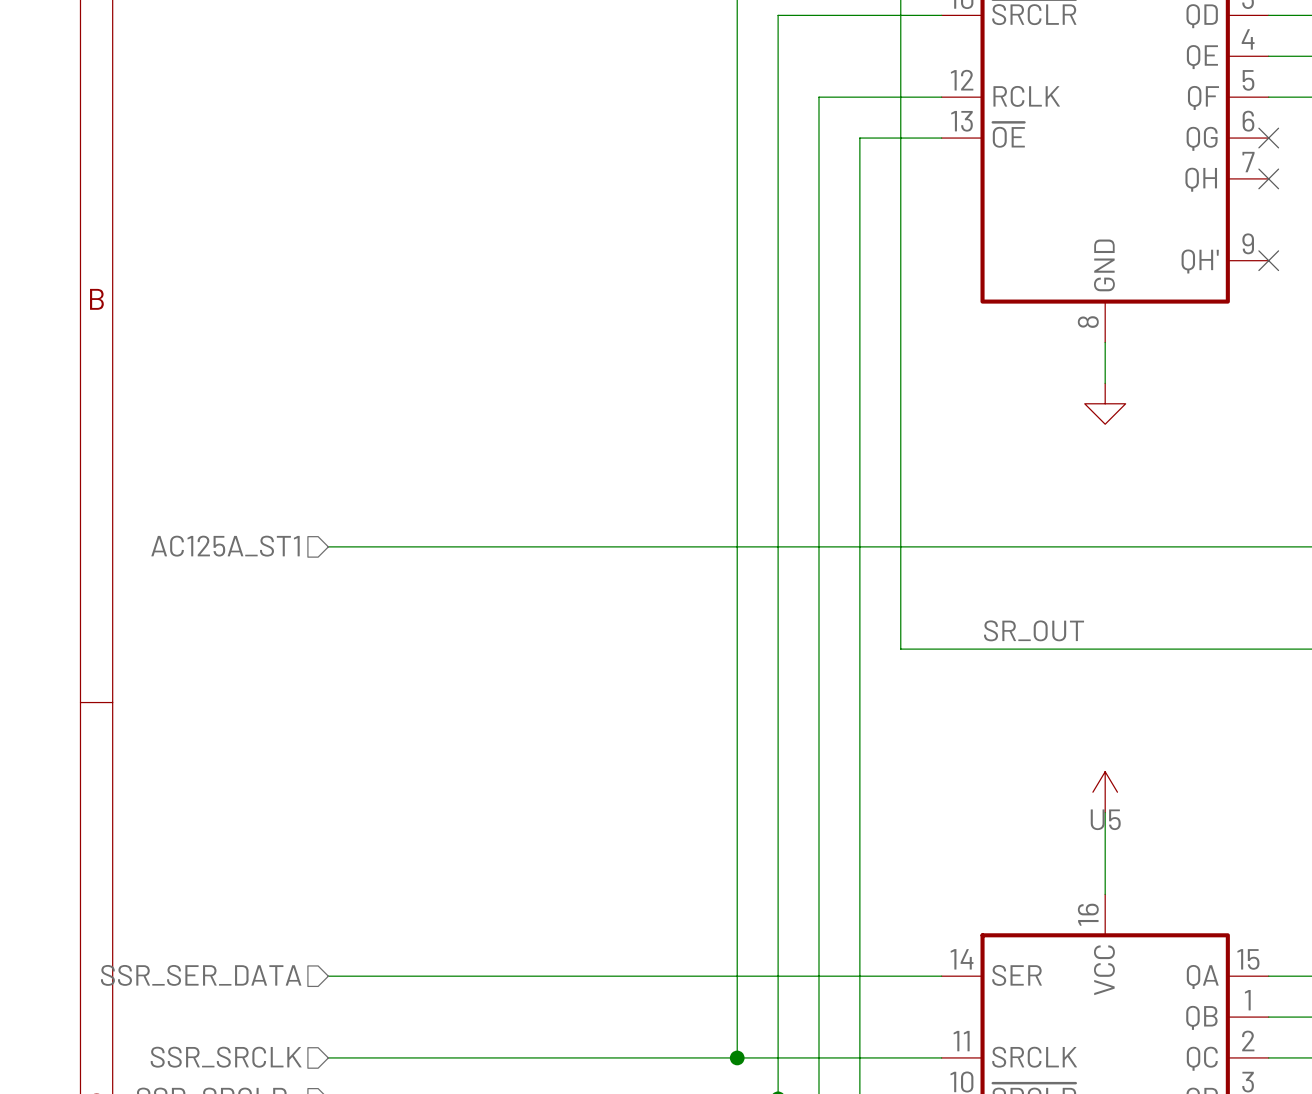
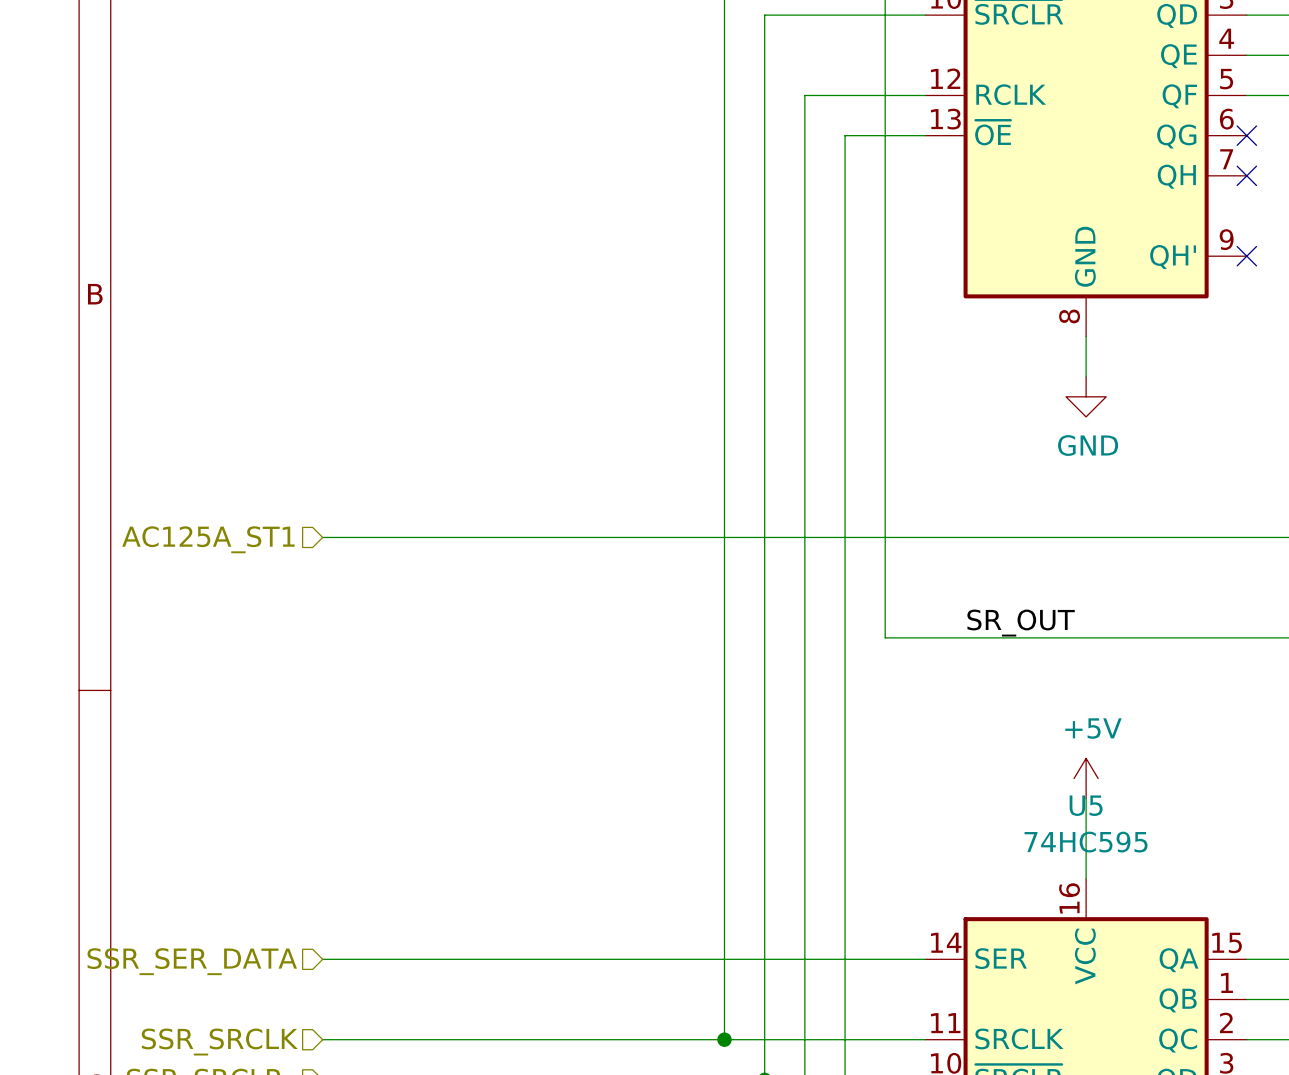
power symbol text: none -> GND (1088, 445)
power symbol text: none -> +5V (1093, 728)
U5 value: none -> 74HC595 (1086, 842)

